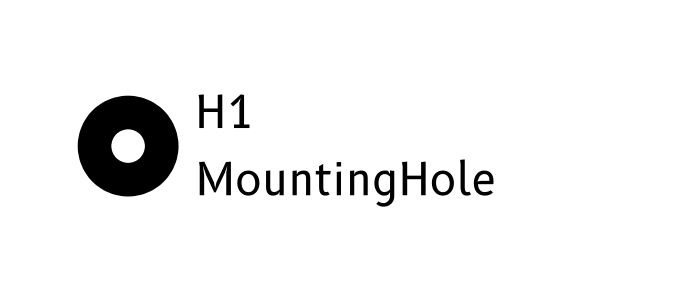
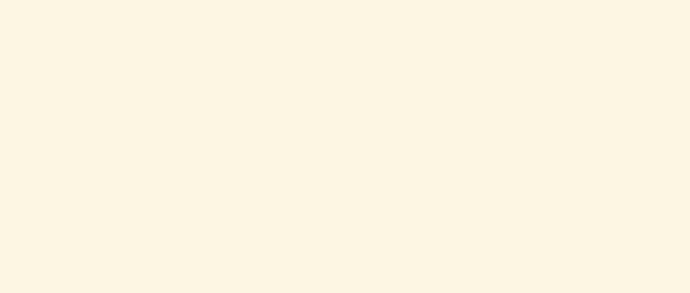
H1: MountingHole (128, 146) -> none

